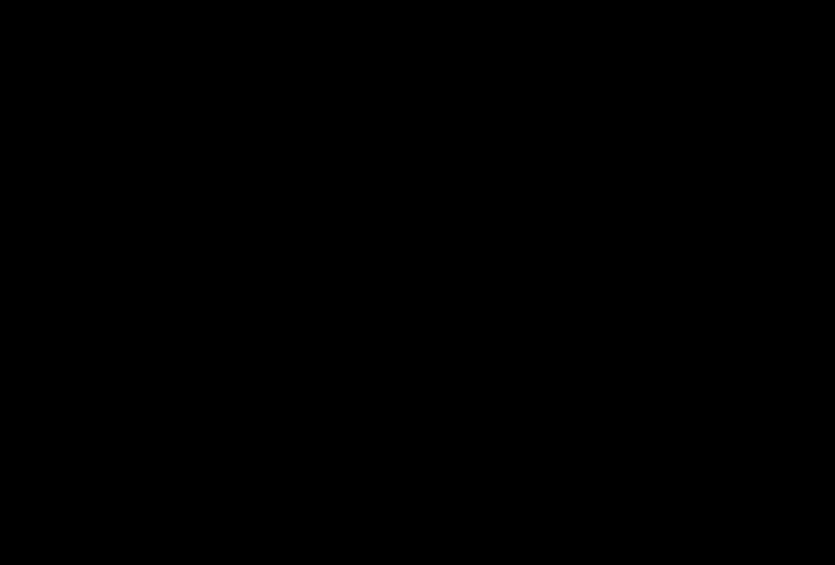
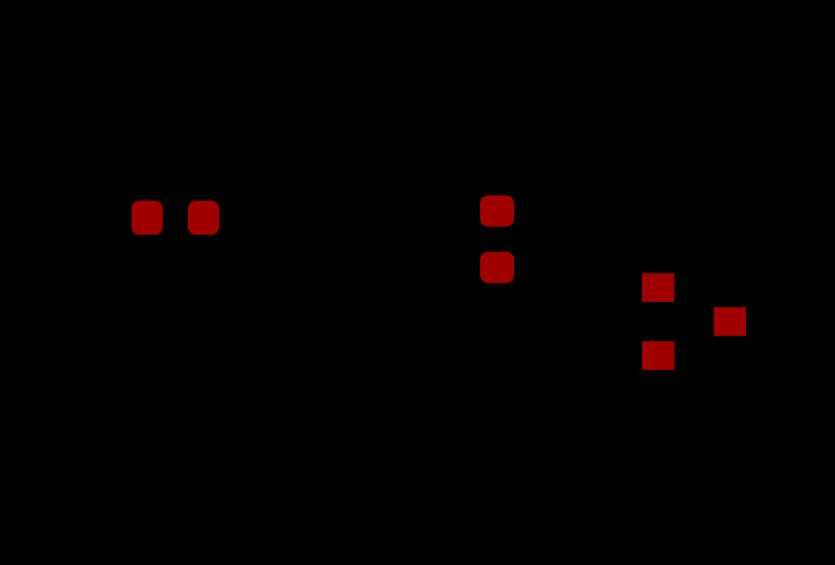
part: none -> (175, 217)
part: none -> (497, 239)
part: none -> (694, 321)

